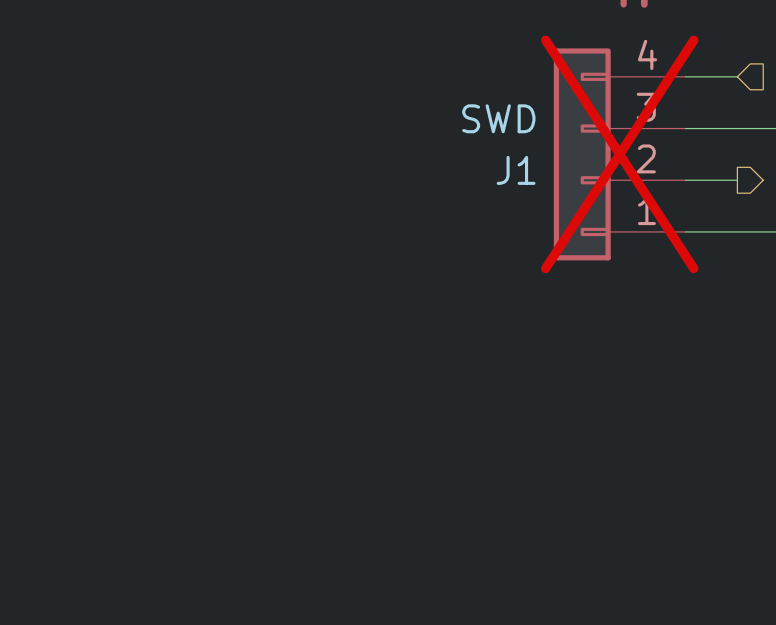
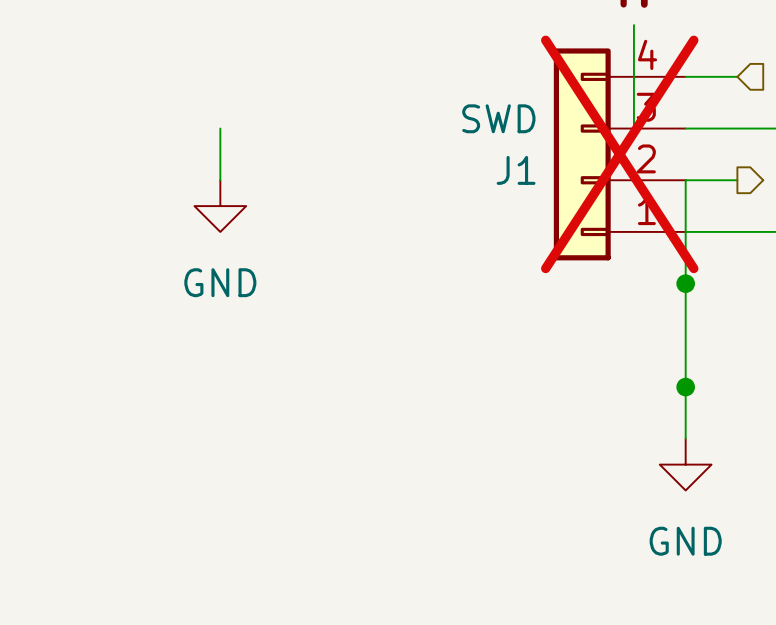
wire: none -> (633, 25) (633, 128)
wire: none -> (220, 128) (220, 180)
wire: none -> (685, 180) (685, 438)
power symbol: none -> GND (220, 206)
junction: none -> (685, 283)
junction: none -> (685, 387)
power symbol: none -> GND (685, 464)

